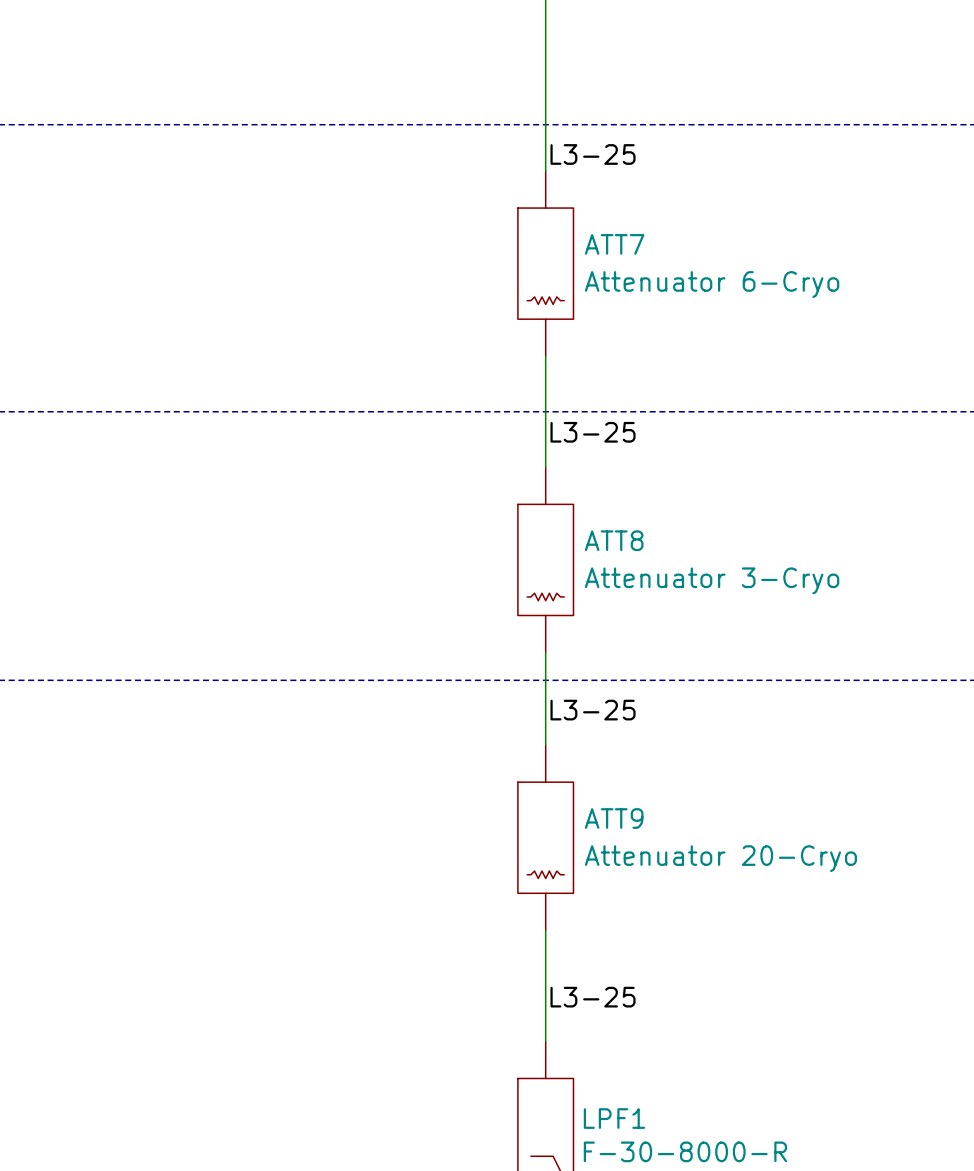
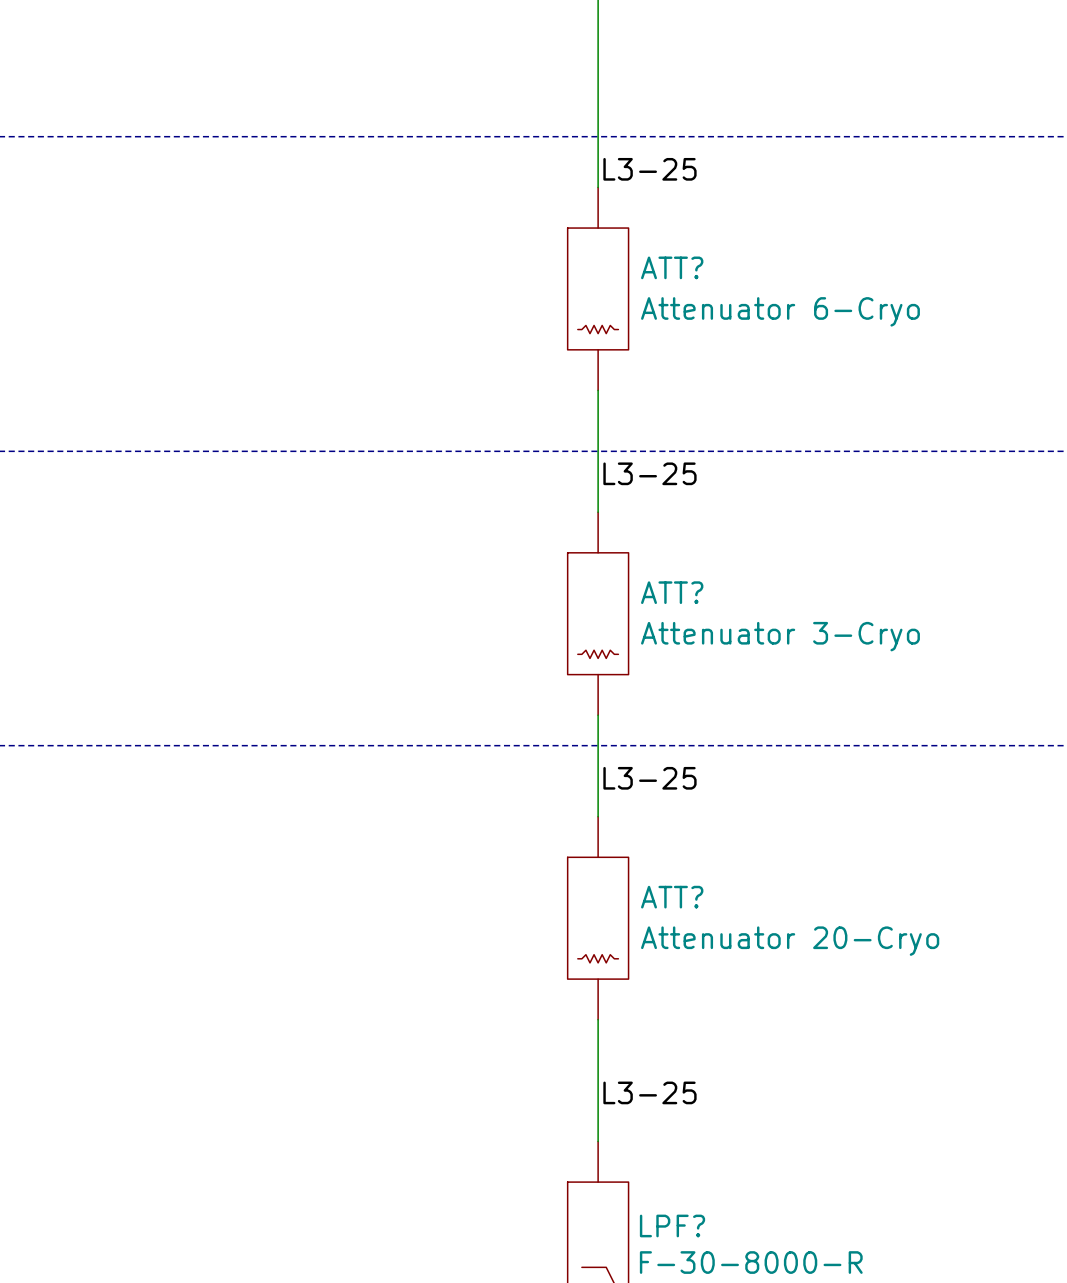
ATT7 name: ATT7 (614, 244) -> ATT? (672, 267)
ATT8 name: ATT8 (614, 540) -> ATT? (672, 592)
ATT9 name: ATT9 (614, 818) -> ATT? (672, 897)
LPF1 name: LPF1 (614, 1118) -> LPF? (672, 1225)

